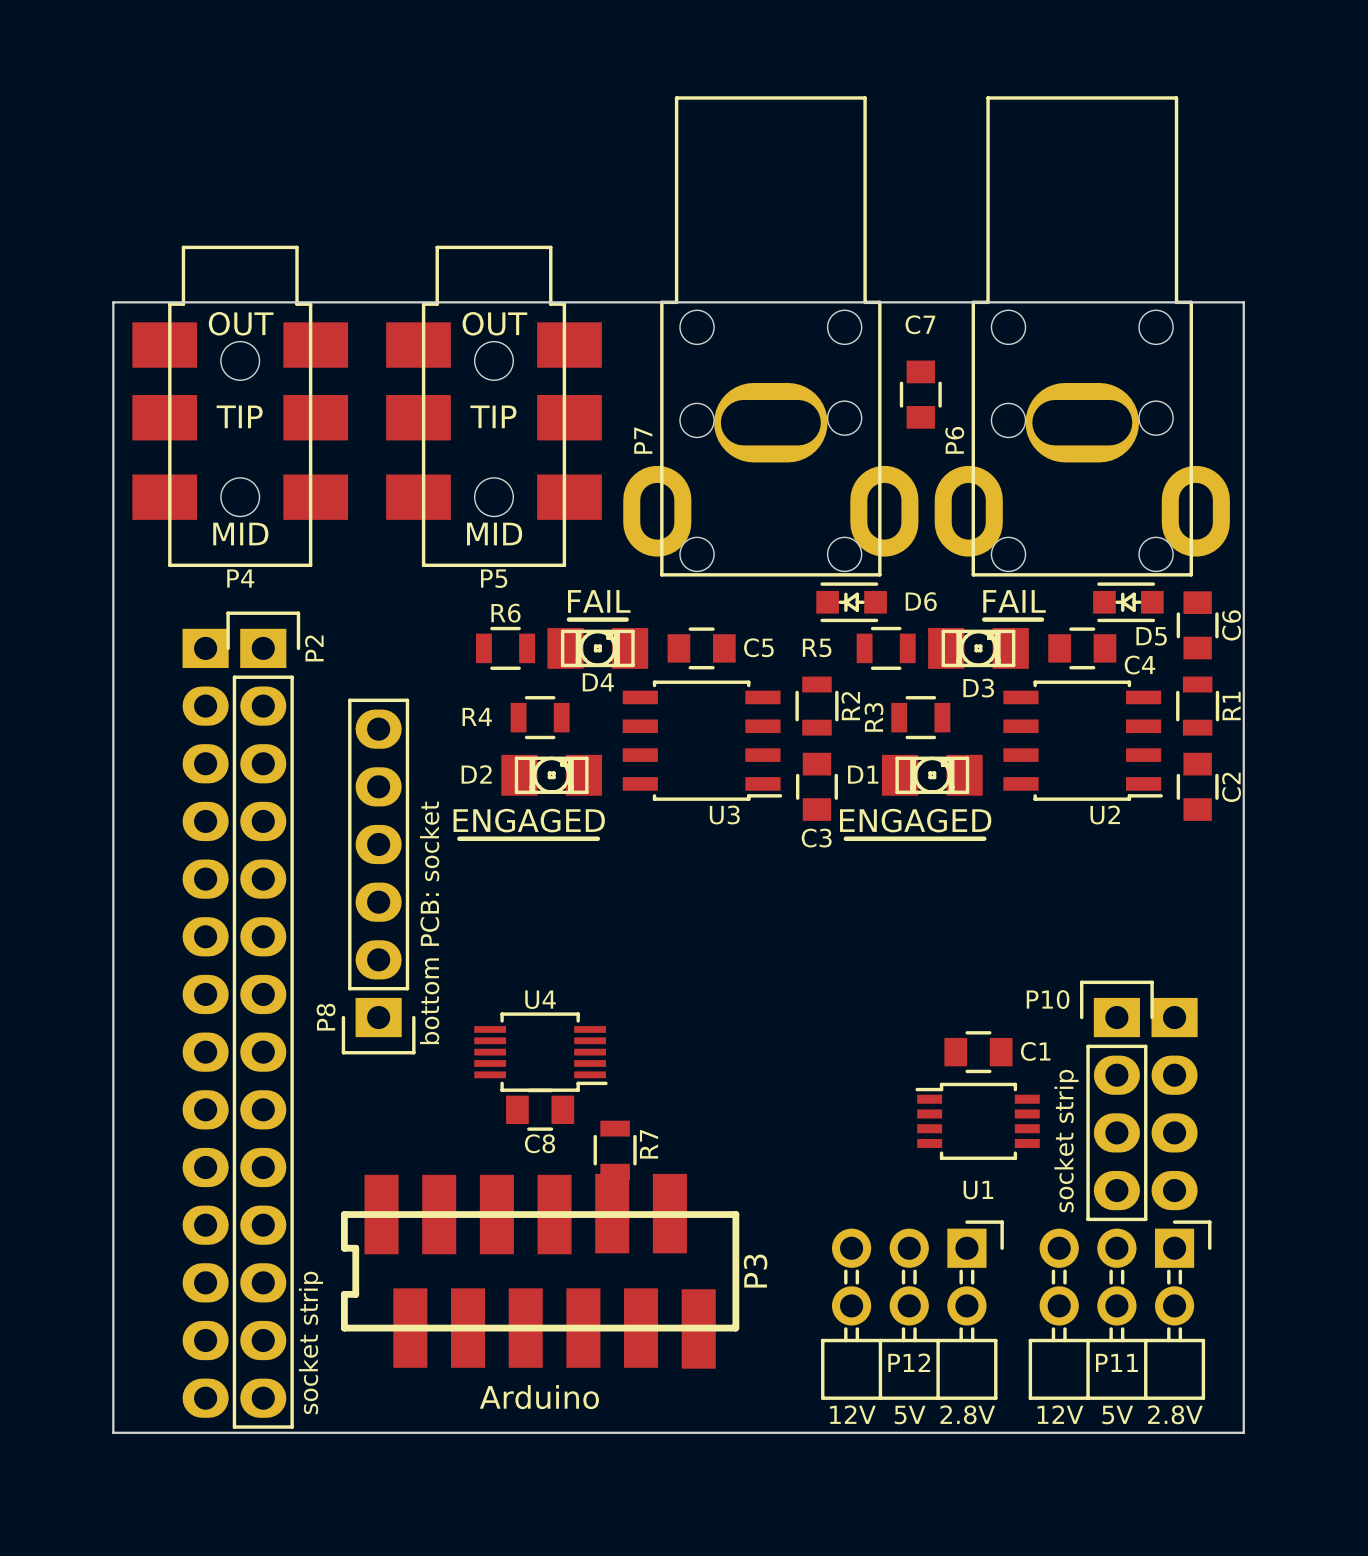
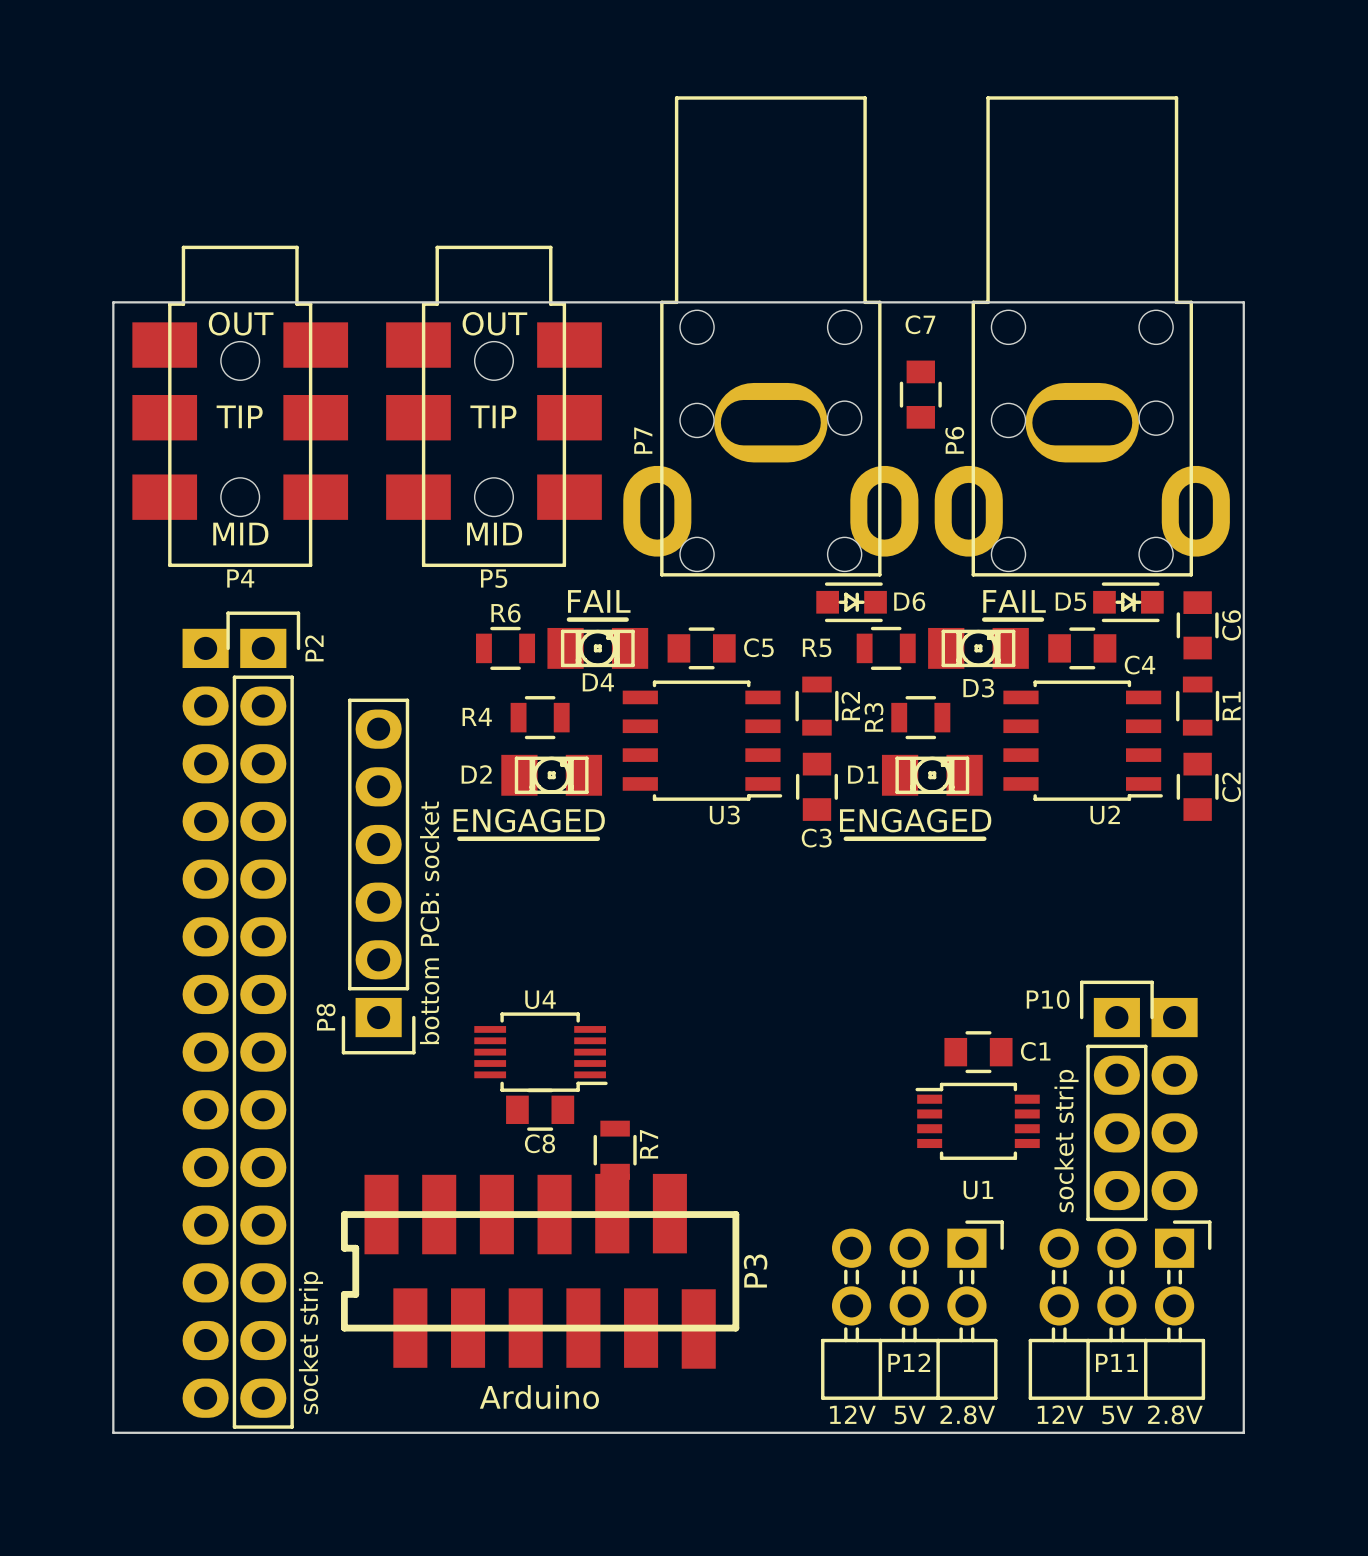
D6 rotation: 0° (851, 602) -> 180° (851, 602)
D5 rotation: 0° (1128, 602) -> 180° (1128, 602)
D5 name position: D5 (1151, 636) -> D5 (1070, 601)

